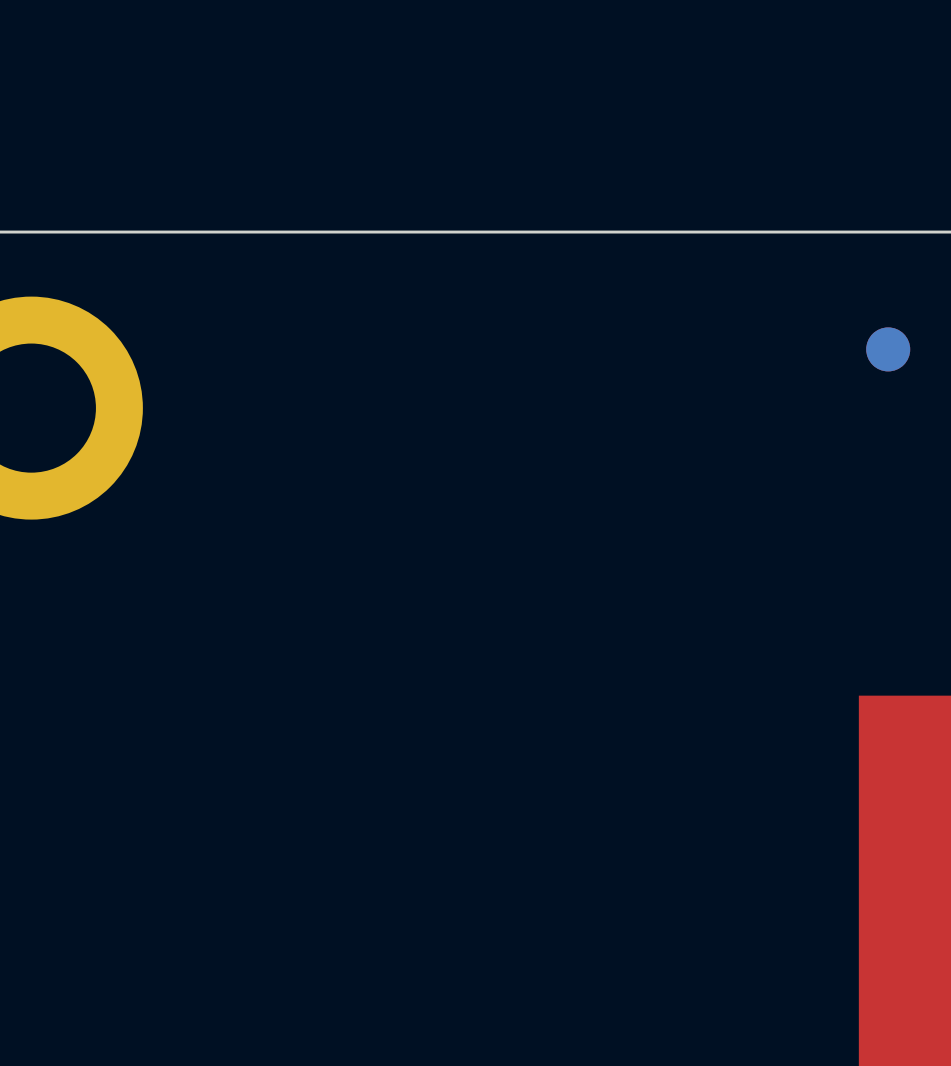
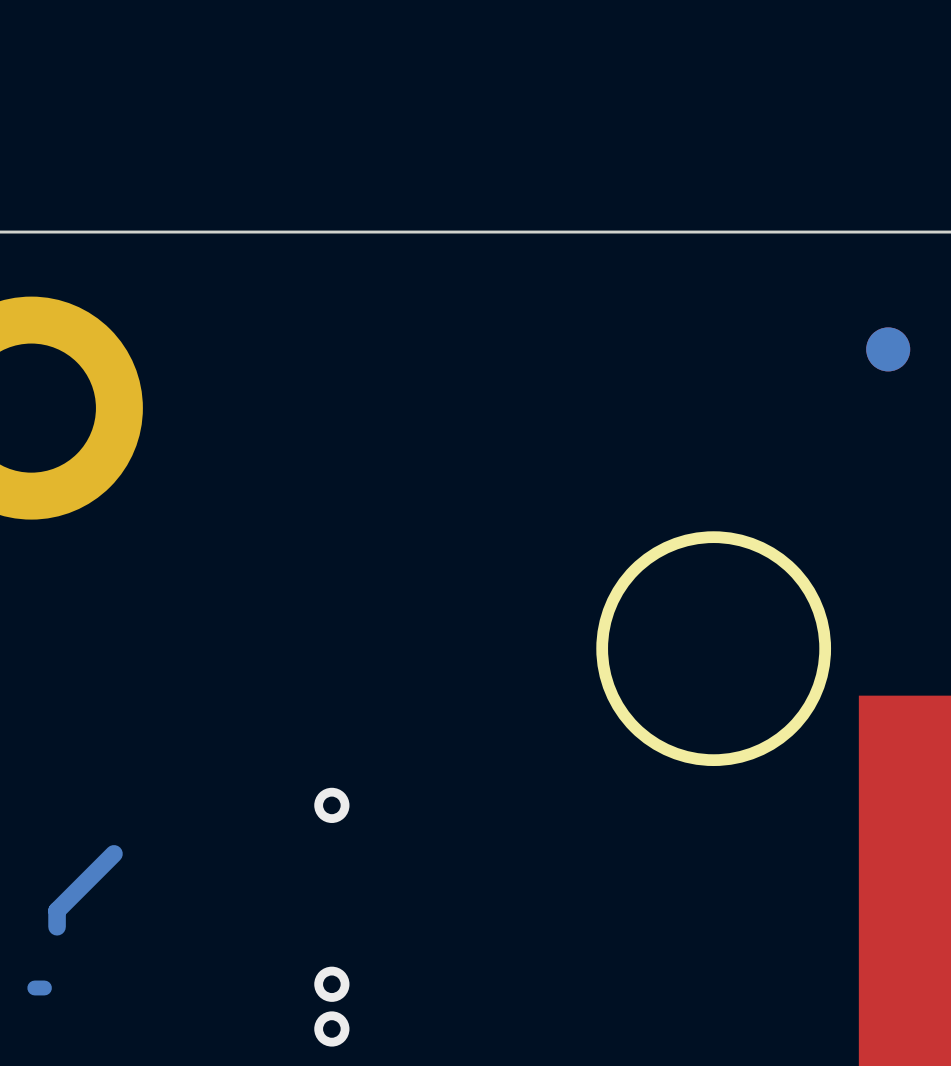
drawing: none -> [596, 531, 832, 767]
via: none -> (331, 805)
bottom track: none -> (113, 853) (57, 910) (57, 926)
via: none -> (331, 984)
bottom track: none -> (44, 987) (34, 987)
via: none -> (331, 1028)

